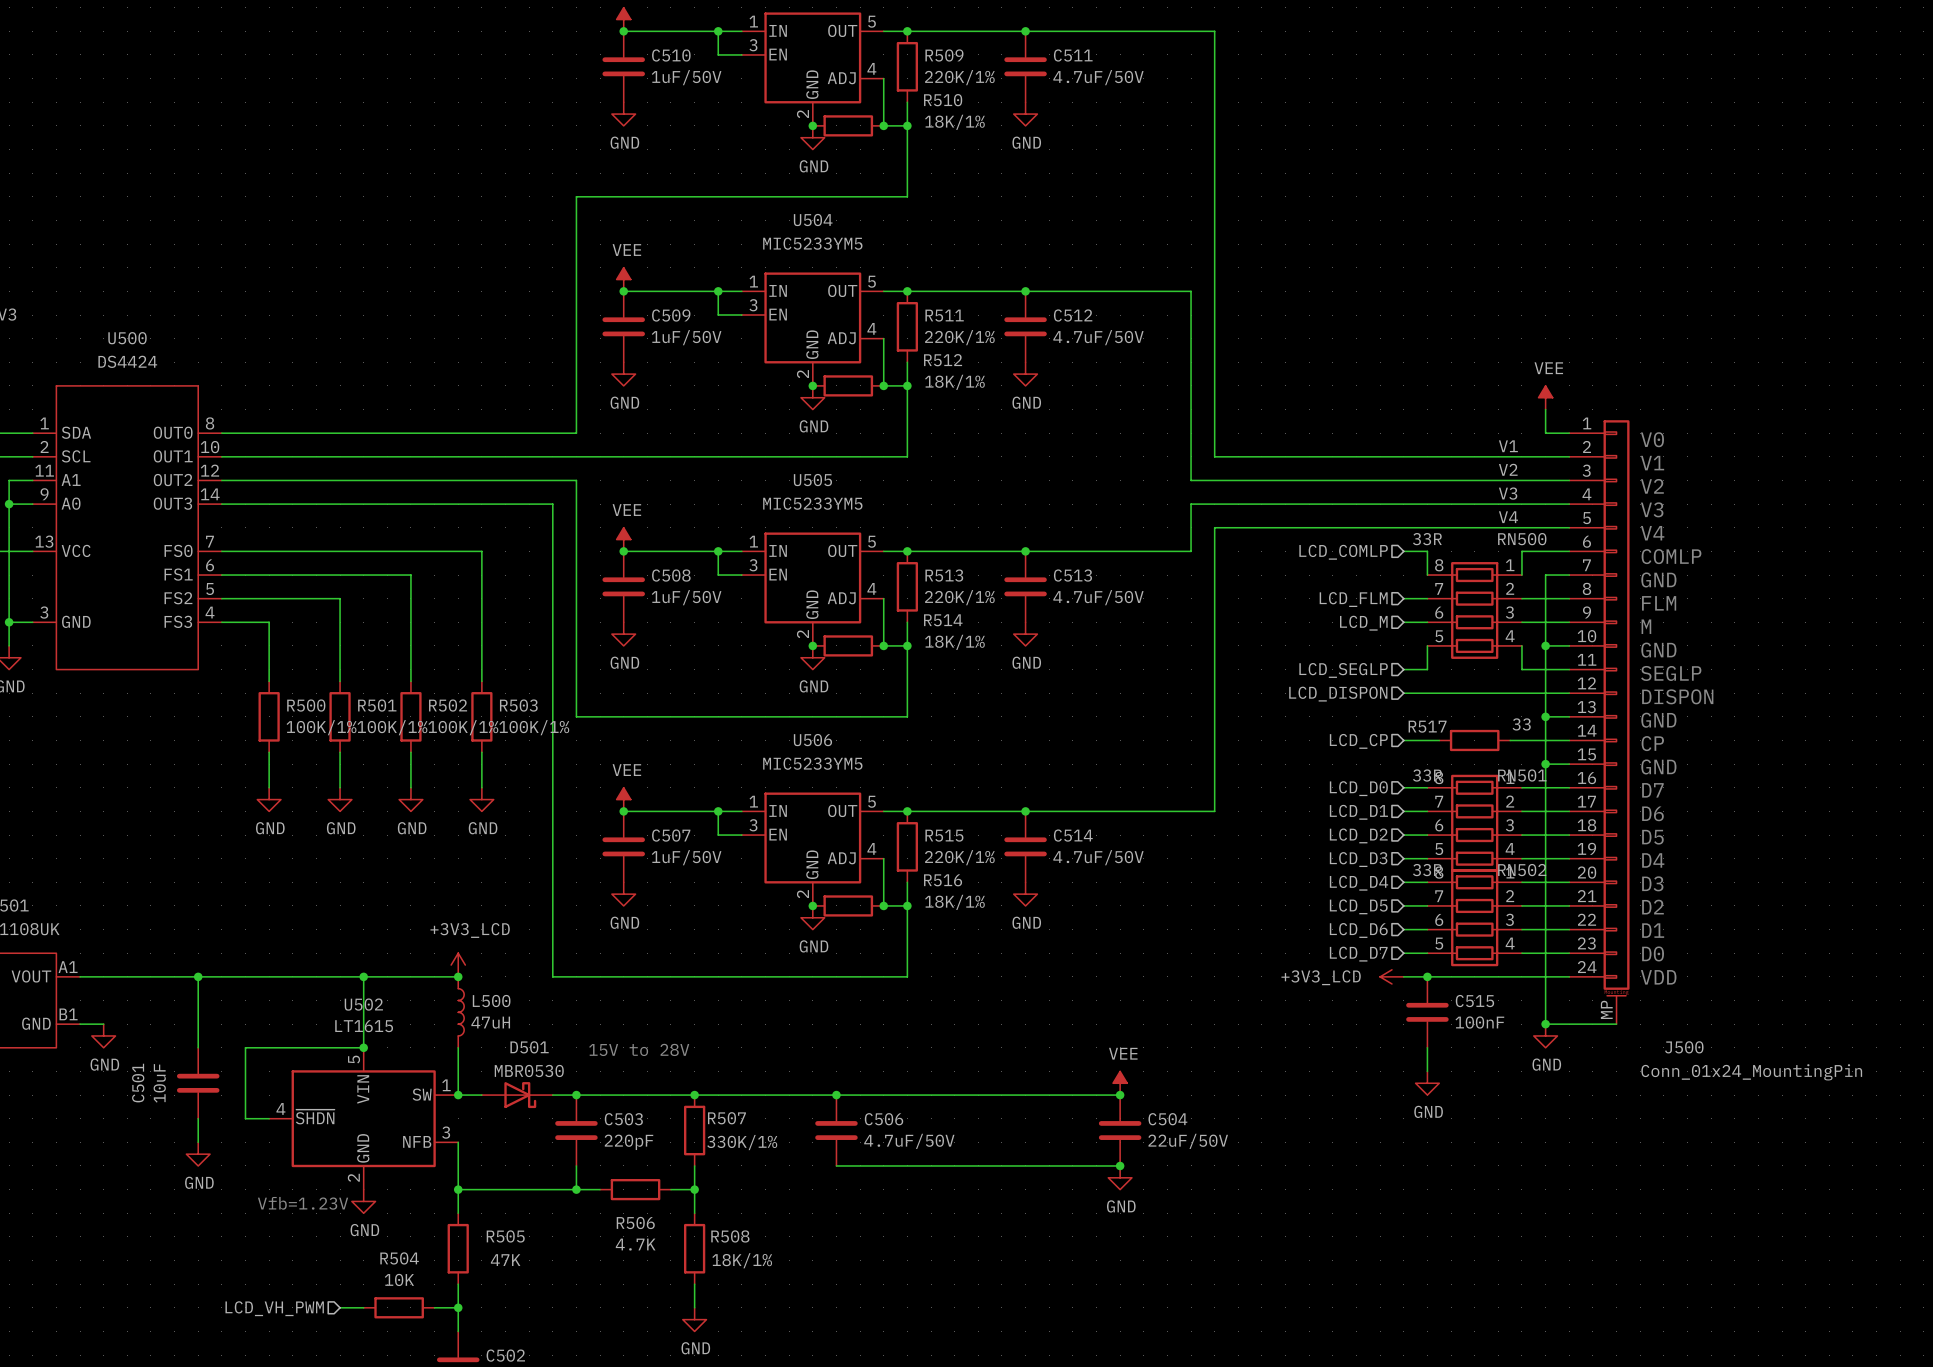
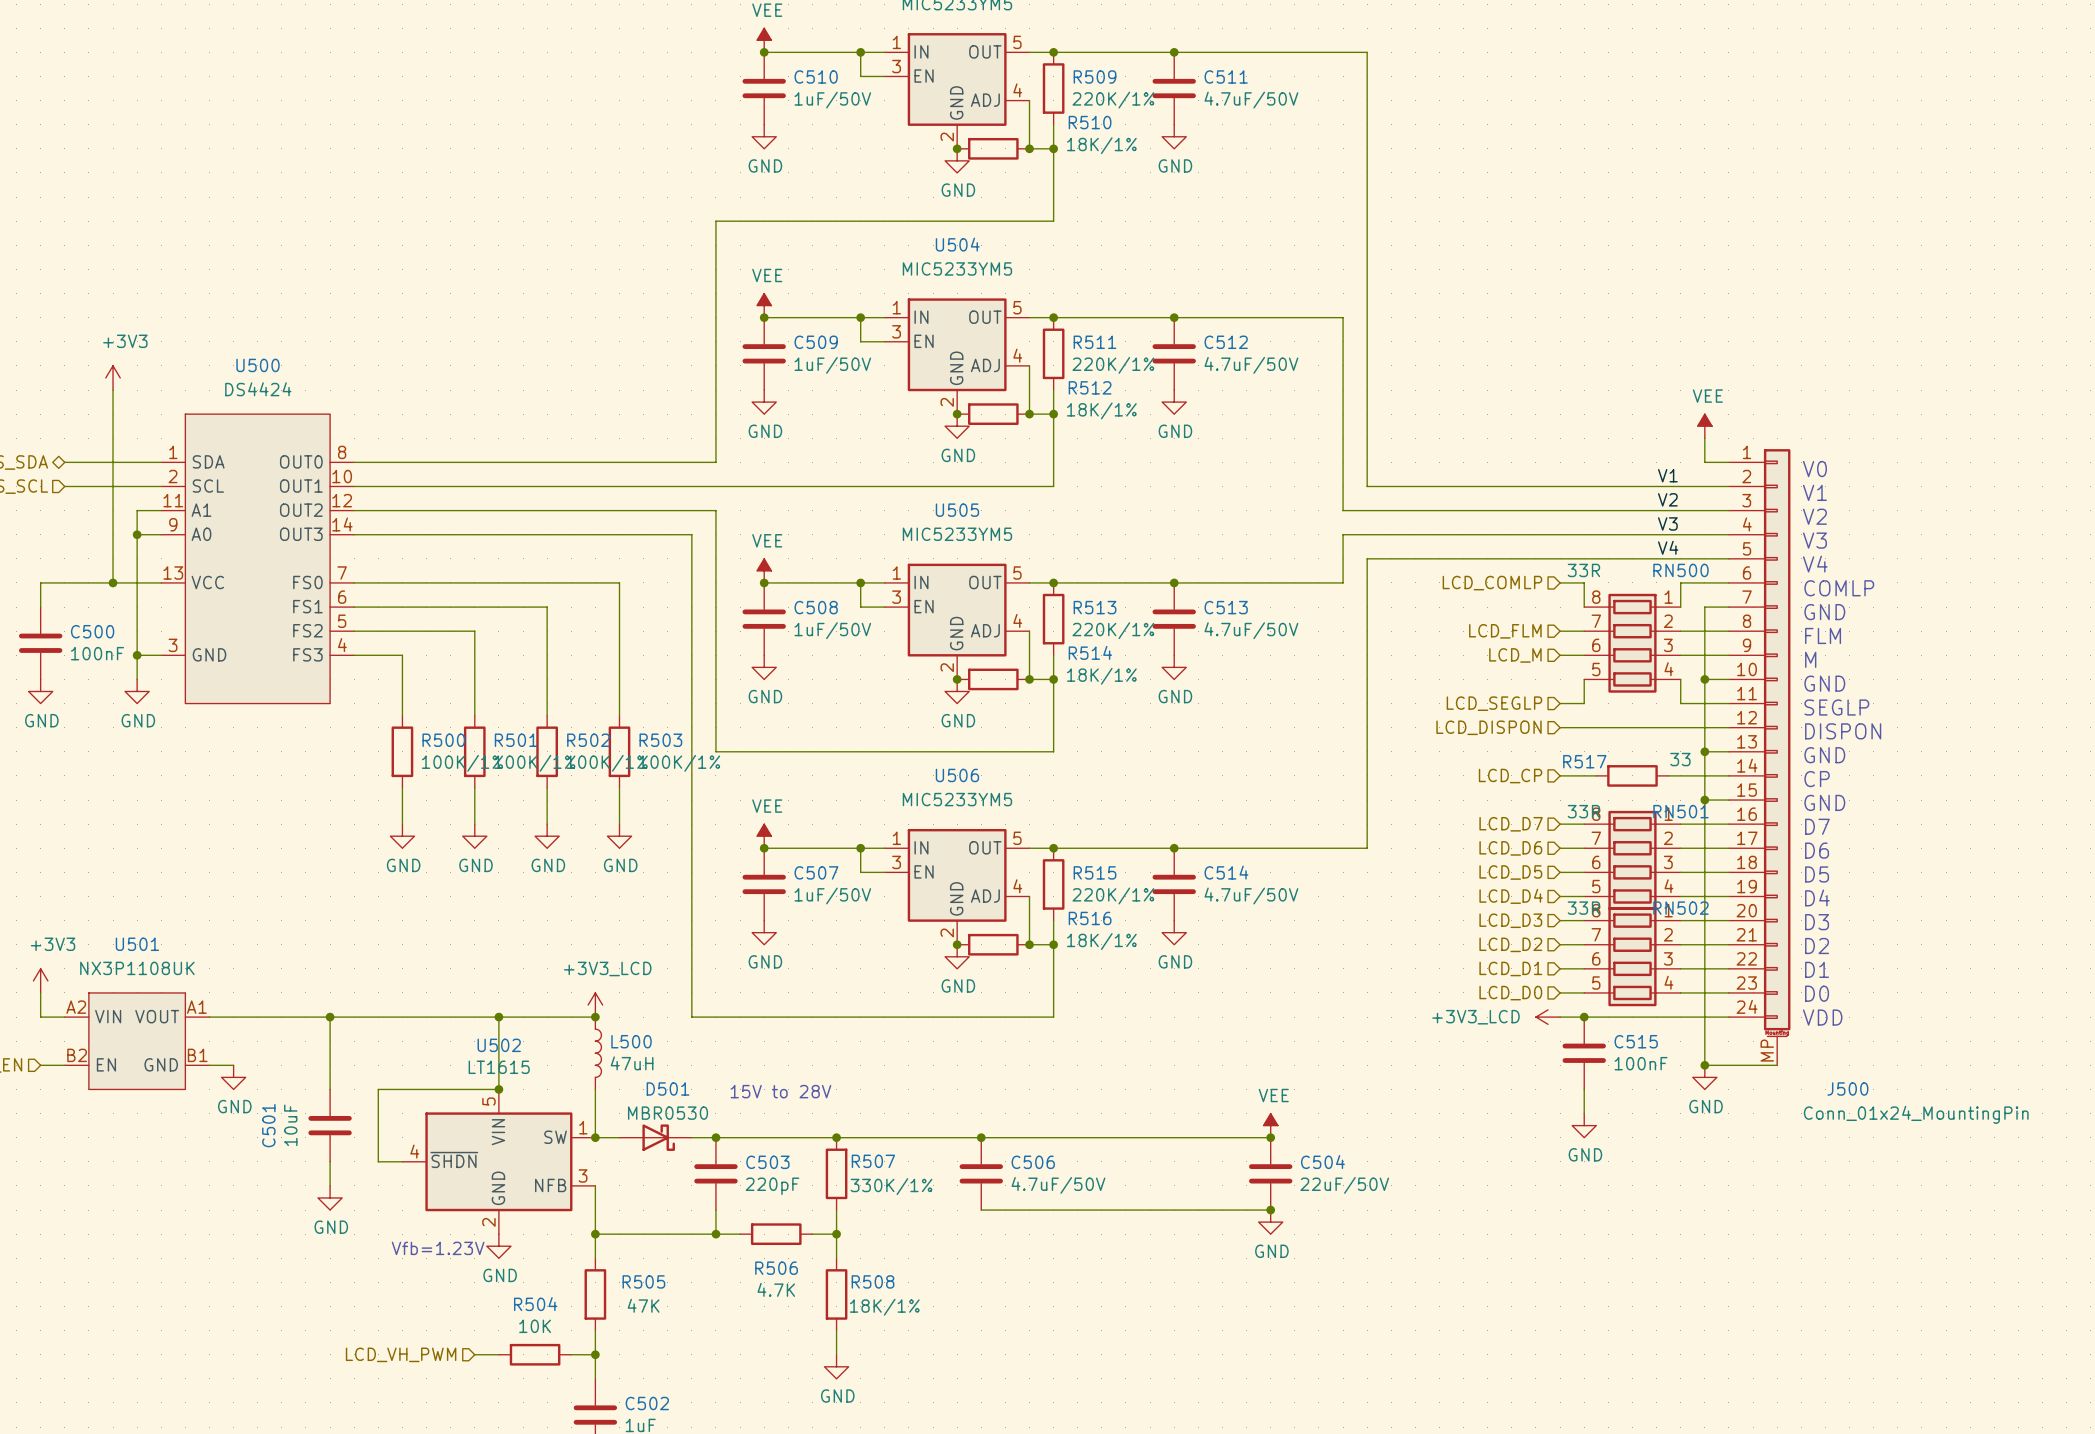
hierarchical label: LCD_D0 (1358, 788) -> LCD_D7 (1511, 824)
hierarchical label: LCD_D1 (1358, 812) -> LCD_D6 (1510, 848)
hierarchical label: LCD_D2 (1358, 835) -> LCD_D5 (1510, 872)
hierarchical label: LCD_D3 (1358, 859) -> LCD_D4 (1511, 896)
hierarchical label: LCD_D4 (1358, 883) -> LCD_D3 (1510, 920)
hierarchical label: LCD_D5 (1358, 906) -> LCD_D2 (1510, 944)
hierarchical label: LCD_D6 (1358, 930) -> LCD_D1 (1510, 968)
hierarchical label: LCD_D7 (1358, 954) -> LCD_D0 (1510, 993)

